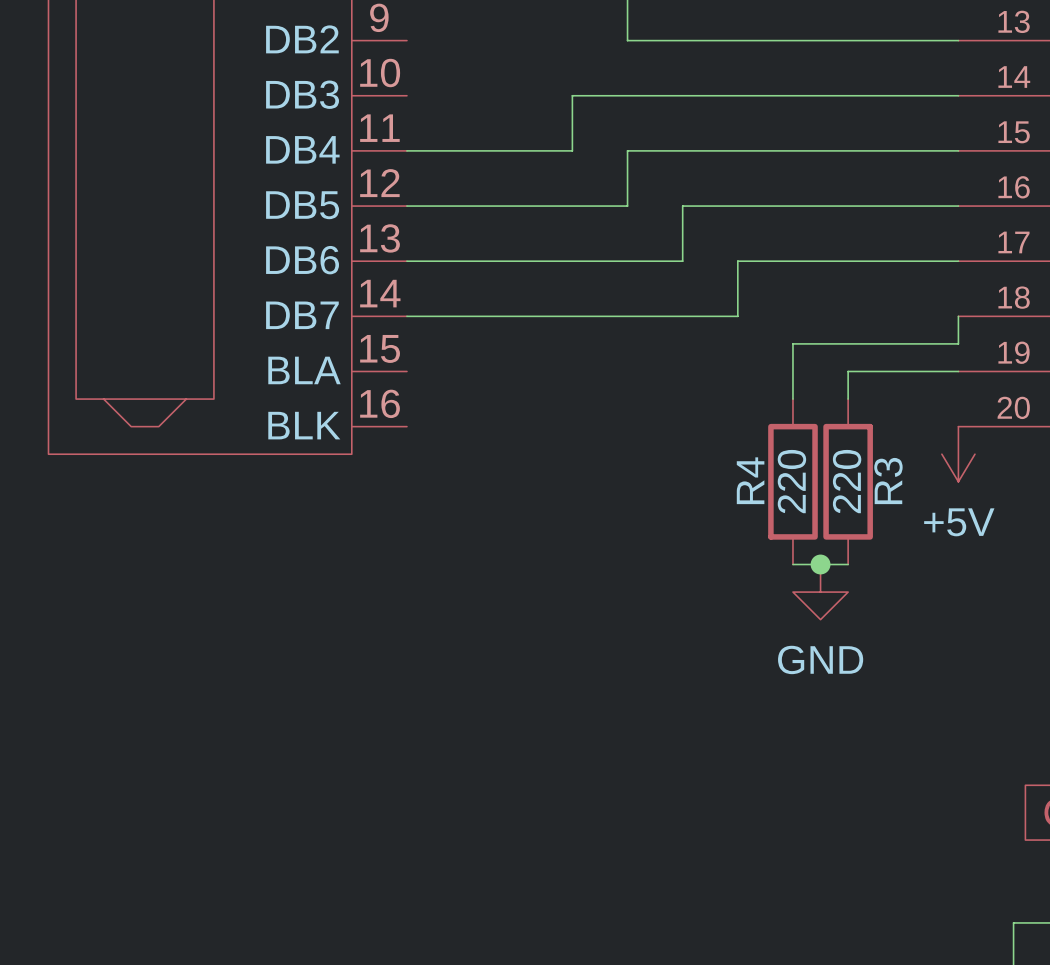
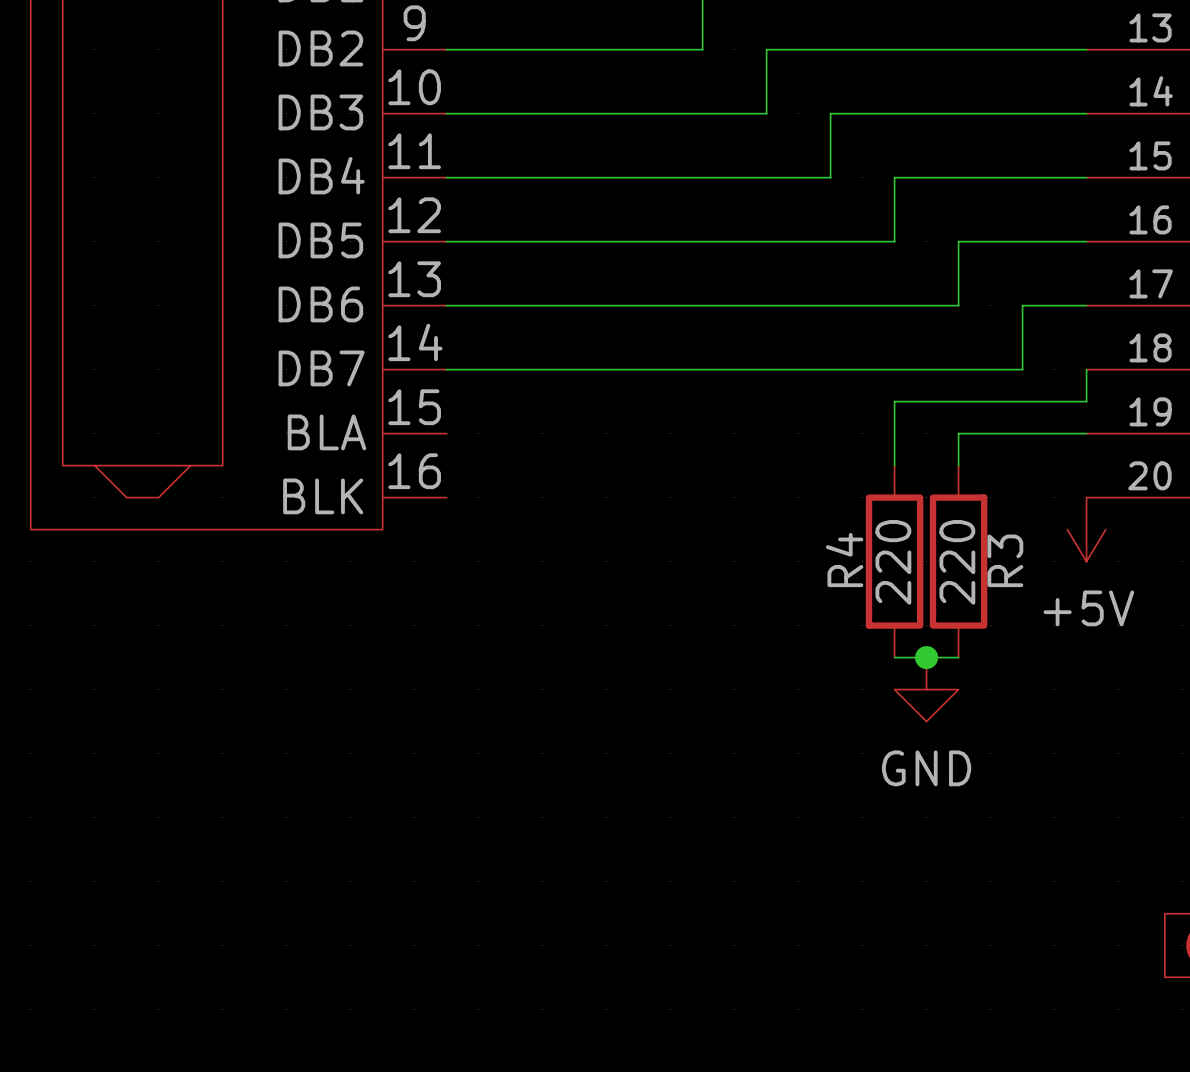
wire: none -> (446, 49) (702, 49)
wire: (627, 40) (682, 40) -> (766, 113) (766, 49)
wire: none -> (446, 113) (638, 113)
wire: (572, 95) (572, 150) -> (702, 177) (638, 177)
wire: (682, 95) (737, 95) -> (830, 177) (830, 113)
wire: (627, 150) (627, 206) -> (766, 241) (702, 241)
wire: (737, 150) (792, 150) -> (894, 241) (894, 177)
wire: (682, 206) (682, 261) -> none
wire: (792, 206) (848, 206) -> (958, 305) (958, 241)
wire: (737, 261) (737, 316) -> (830, 305) (766, 305)
wire: (848, 261) (903, 261) -> (830, 369) (1022, 369) (1022, 305)

